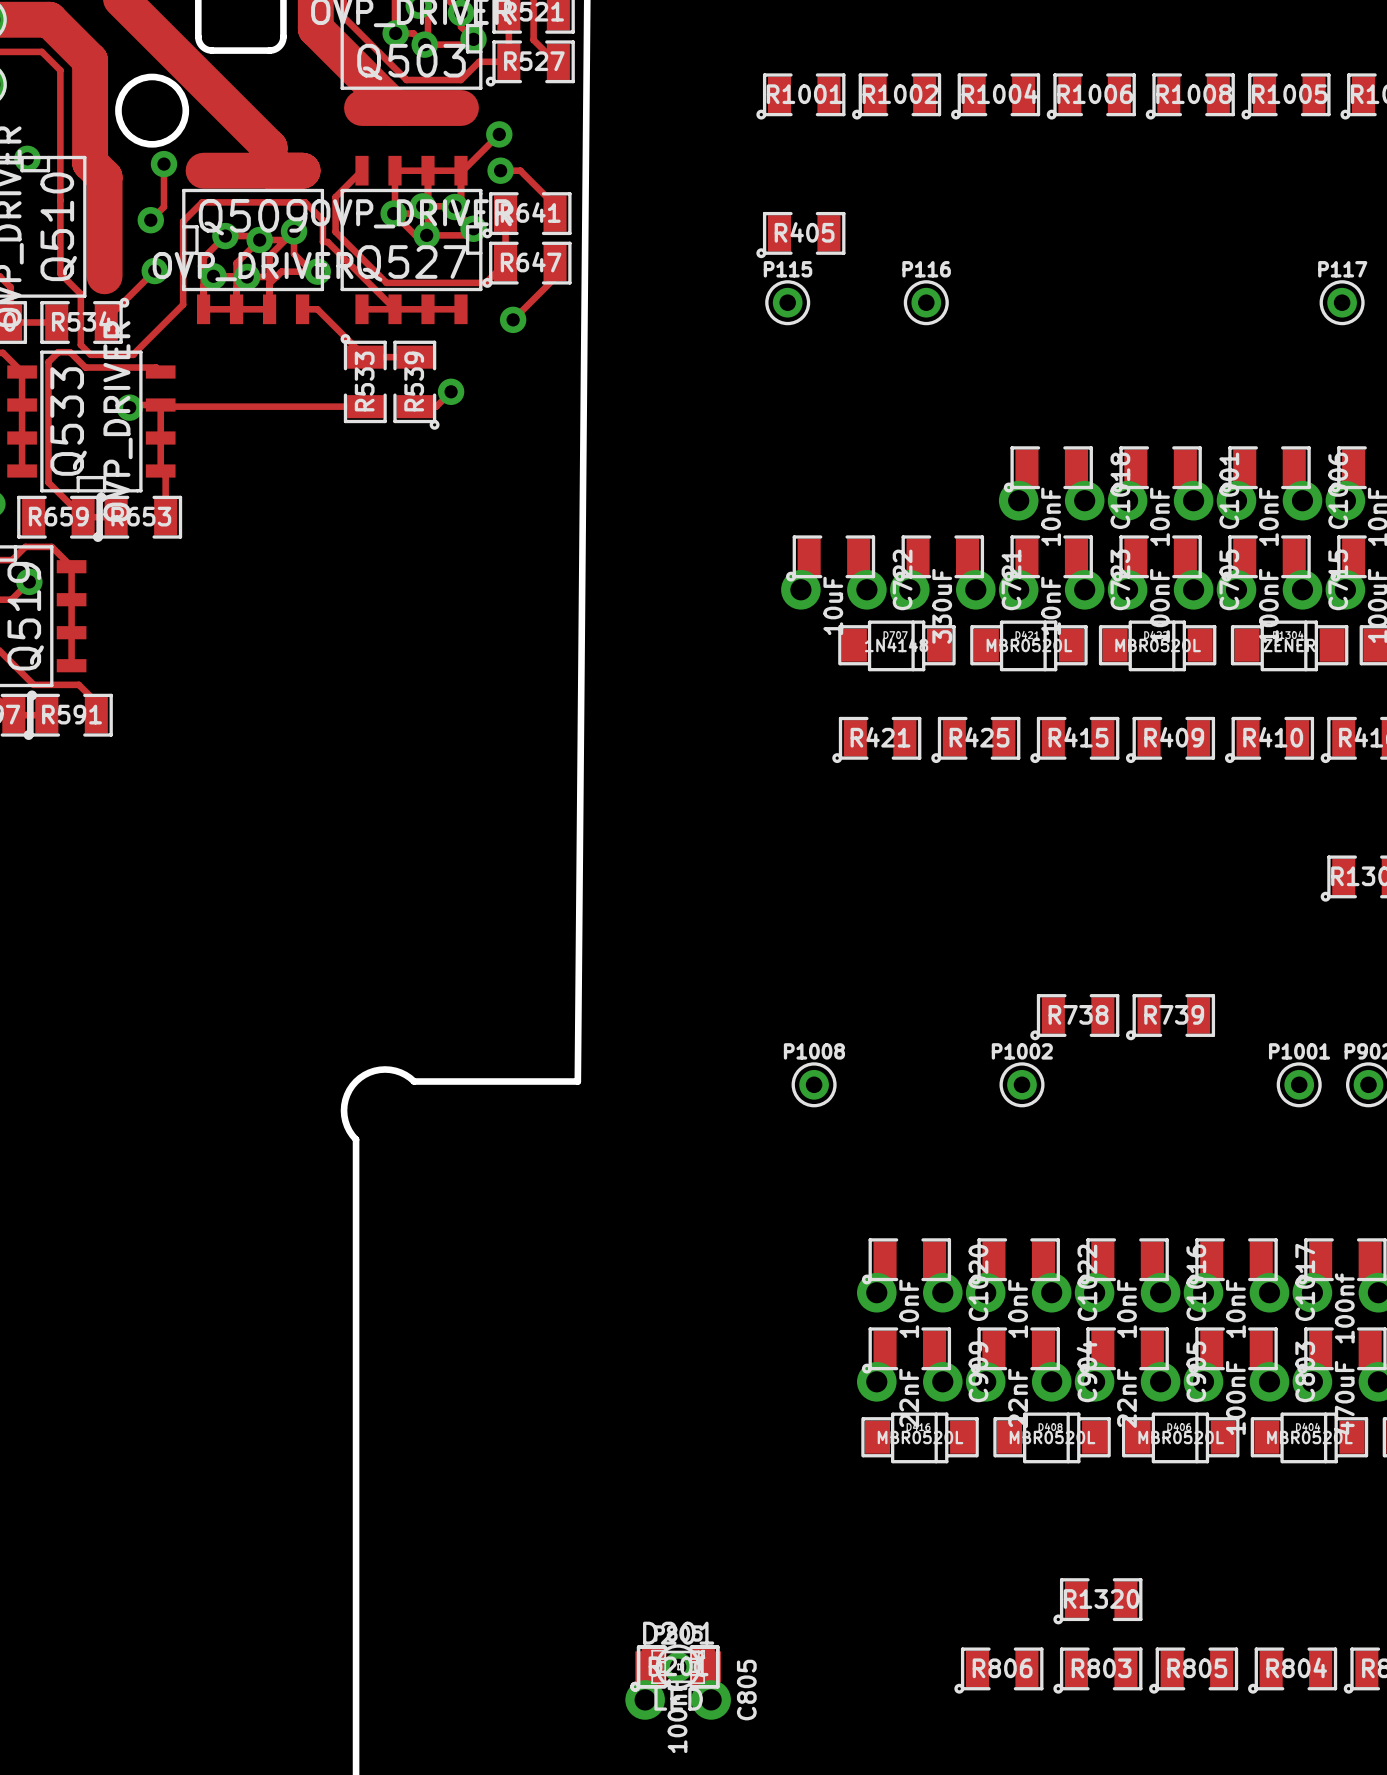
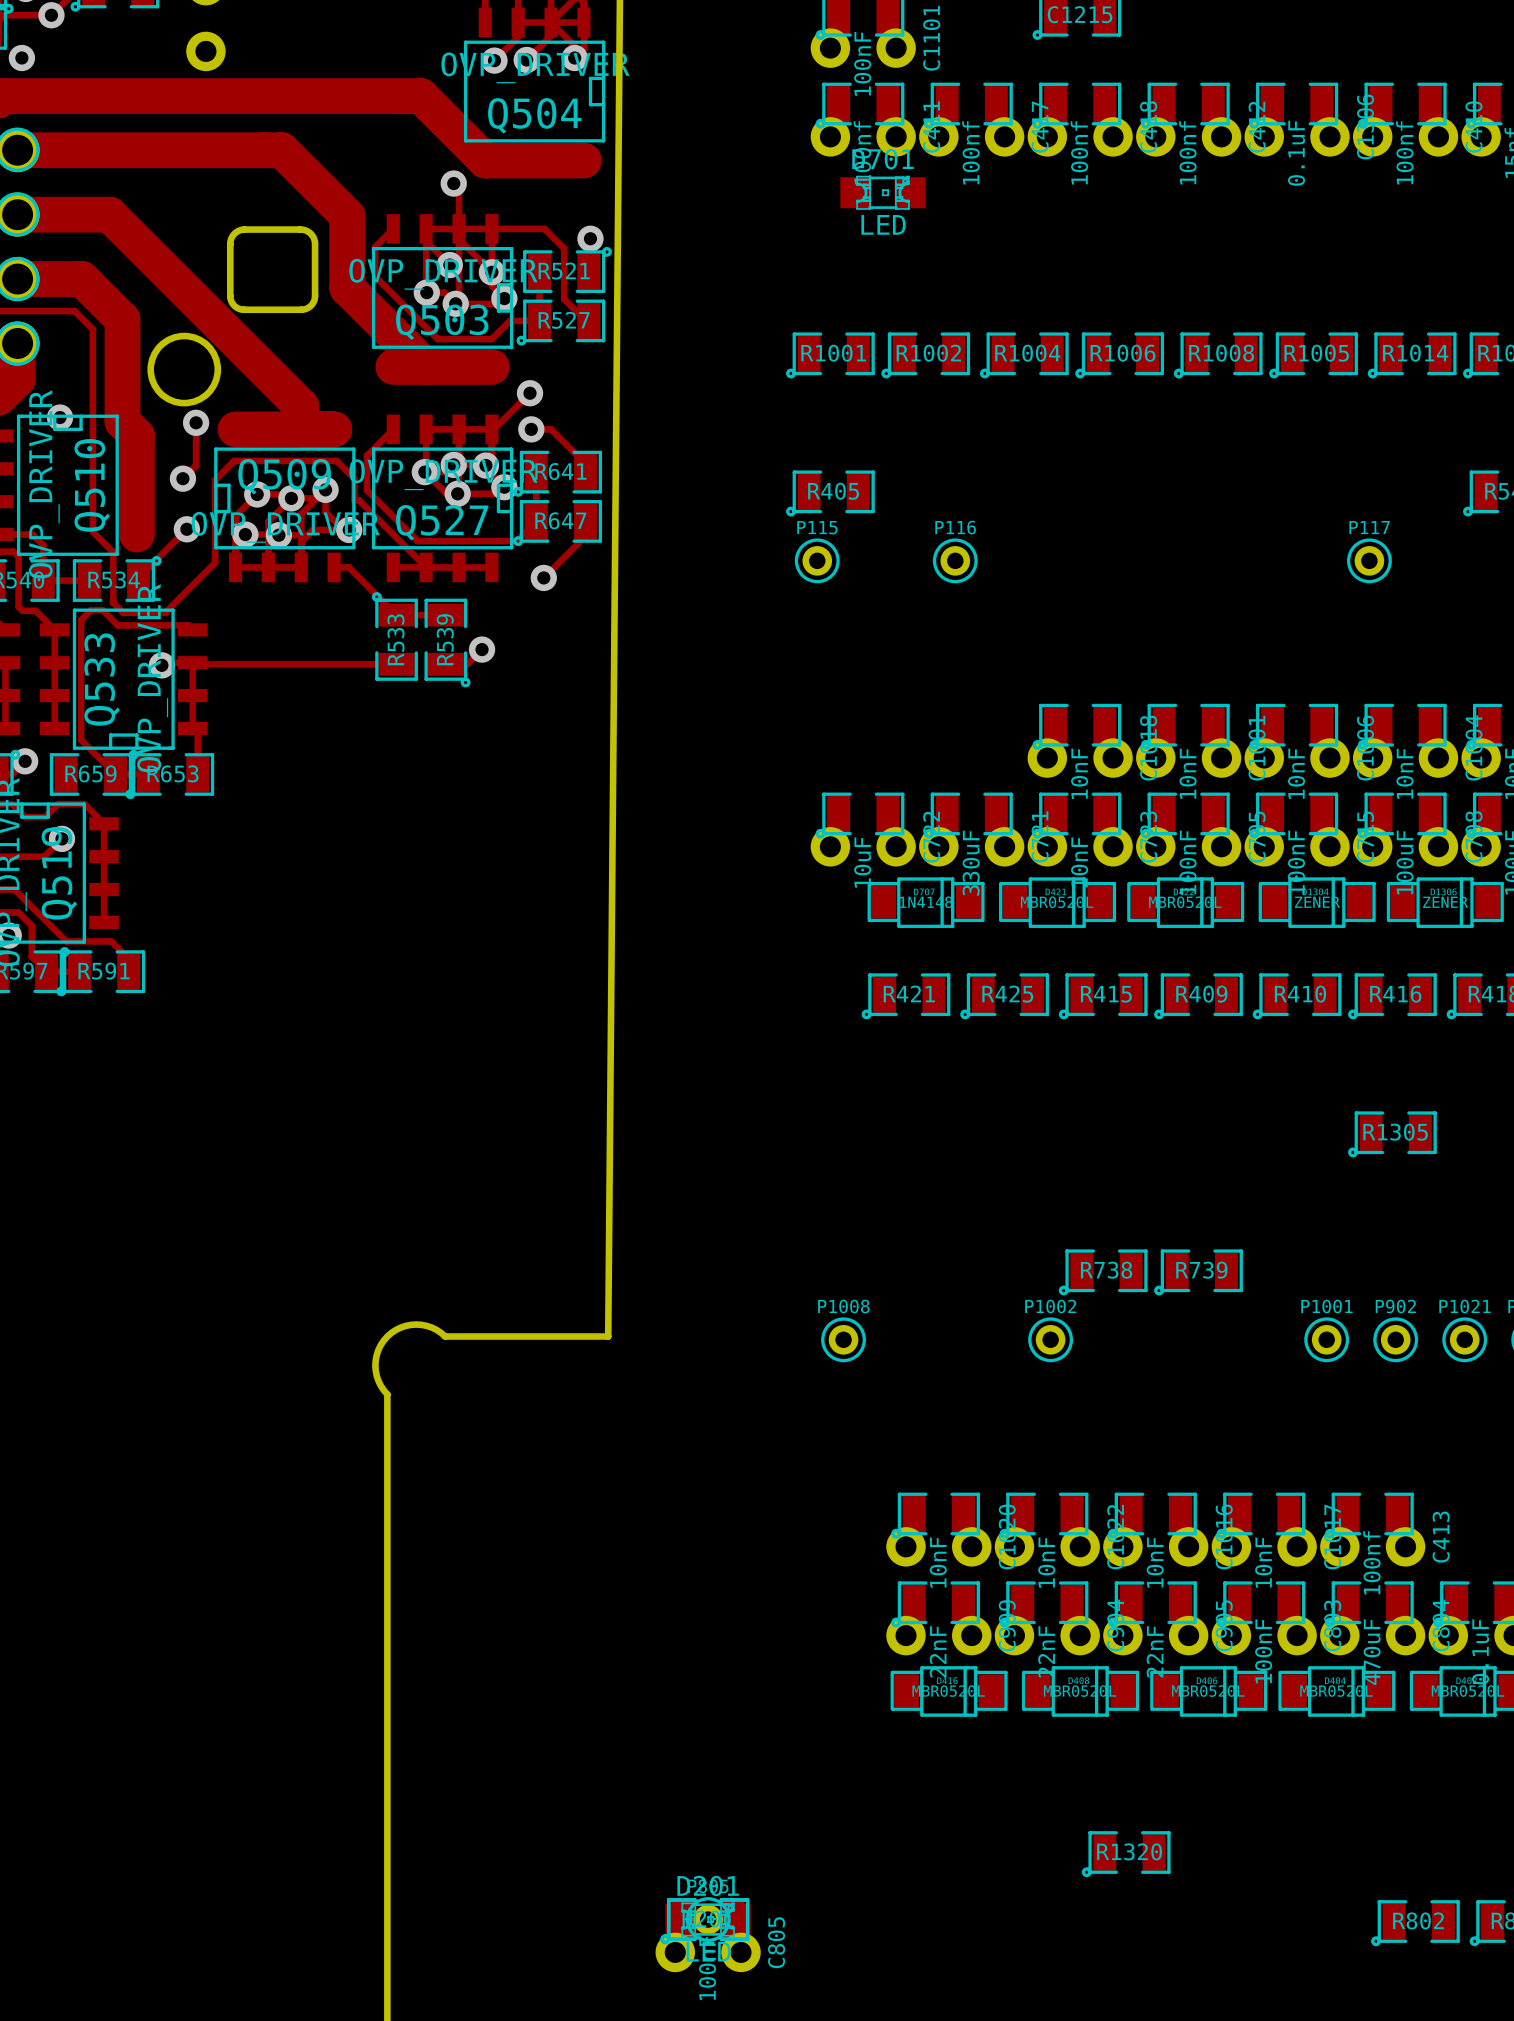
R806: (998, 1670) -> none
R803: (1097, 1670) -> none
R805: (1193, 1670) -> none
R804: (1292, 1670) -> none

